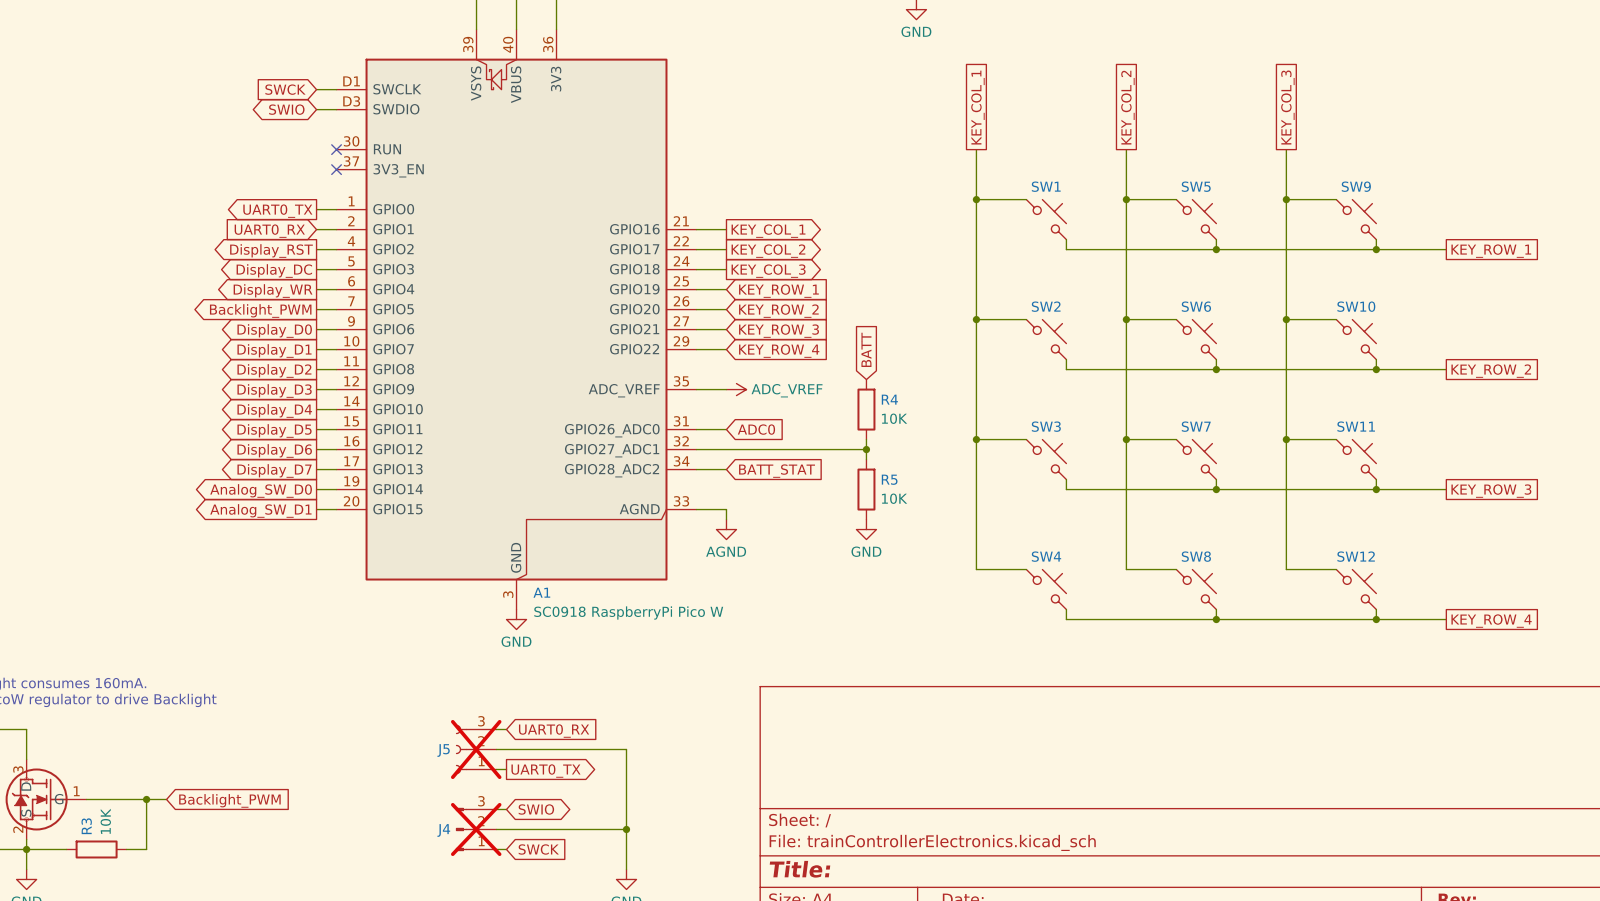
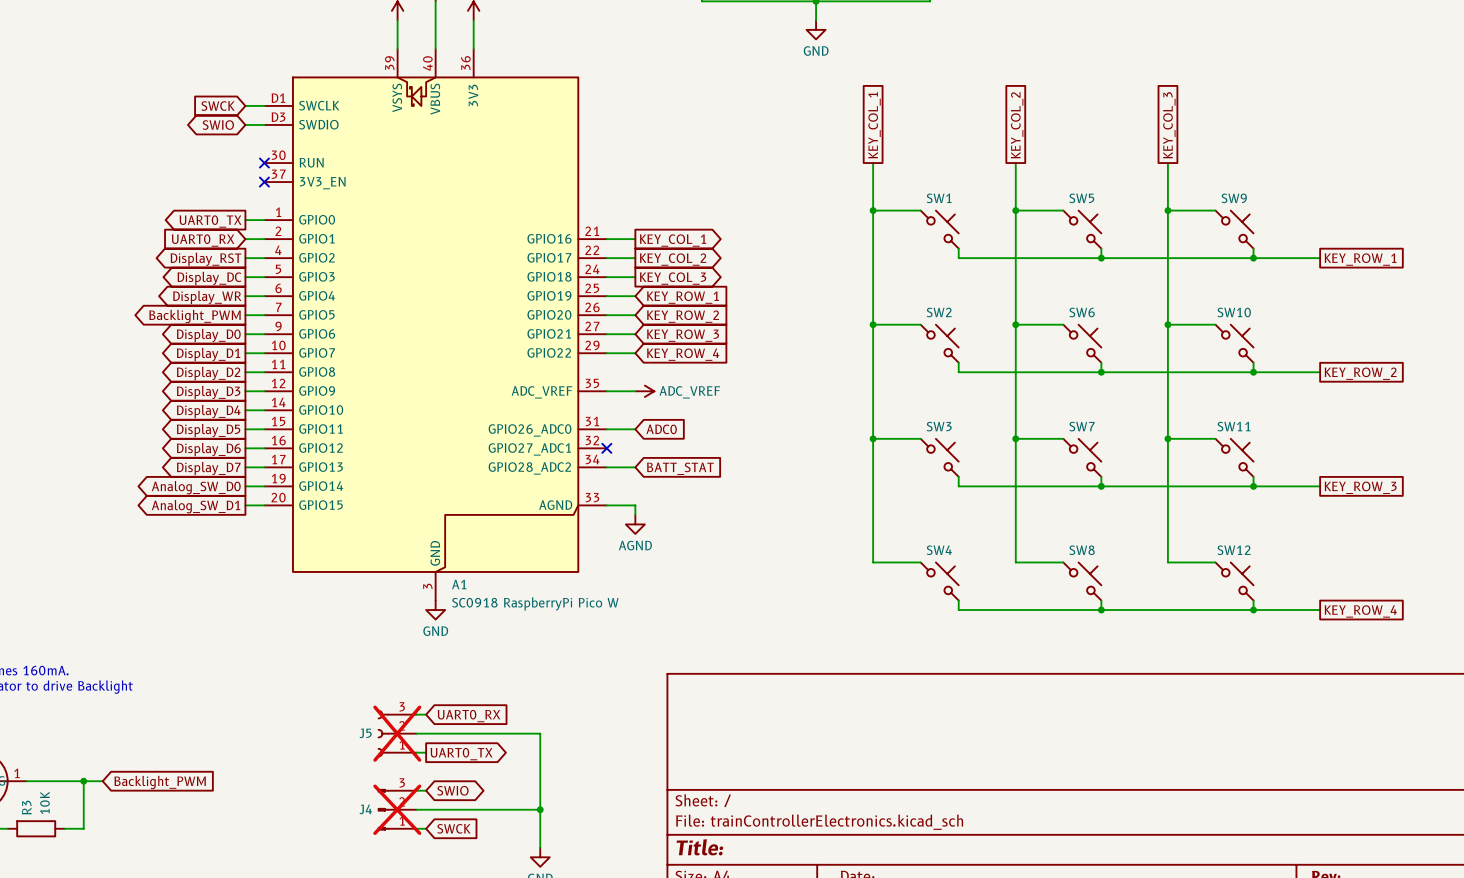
global label: BATT (866, 349) -> none
R4: 10K (866, 409) -> none
wire: (866, 439) (866, 459) -> none
wire: (696, 449) (866, 449) -> none
no-connect mark: none -> (606, 448)
junction: (866, 449) -> none
R5: 10K (866, 489) -> none
power symbol: GND (866, 529) -> none

